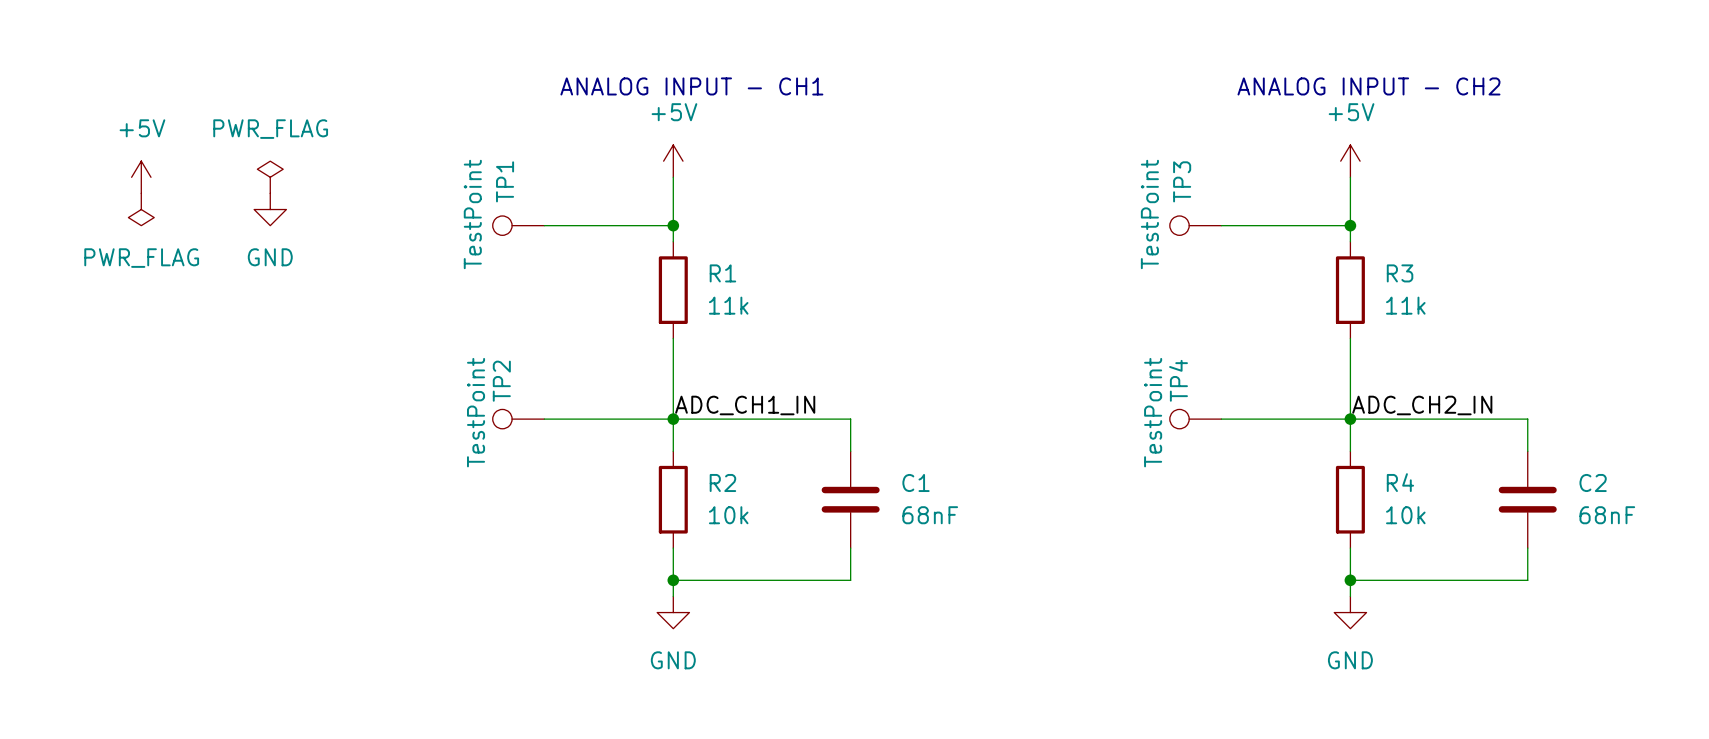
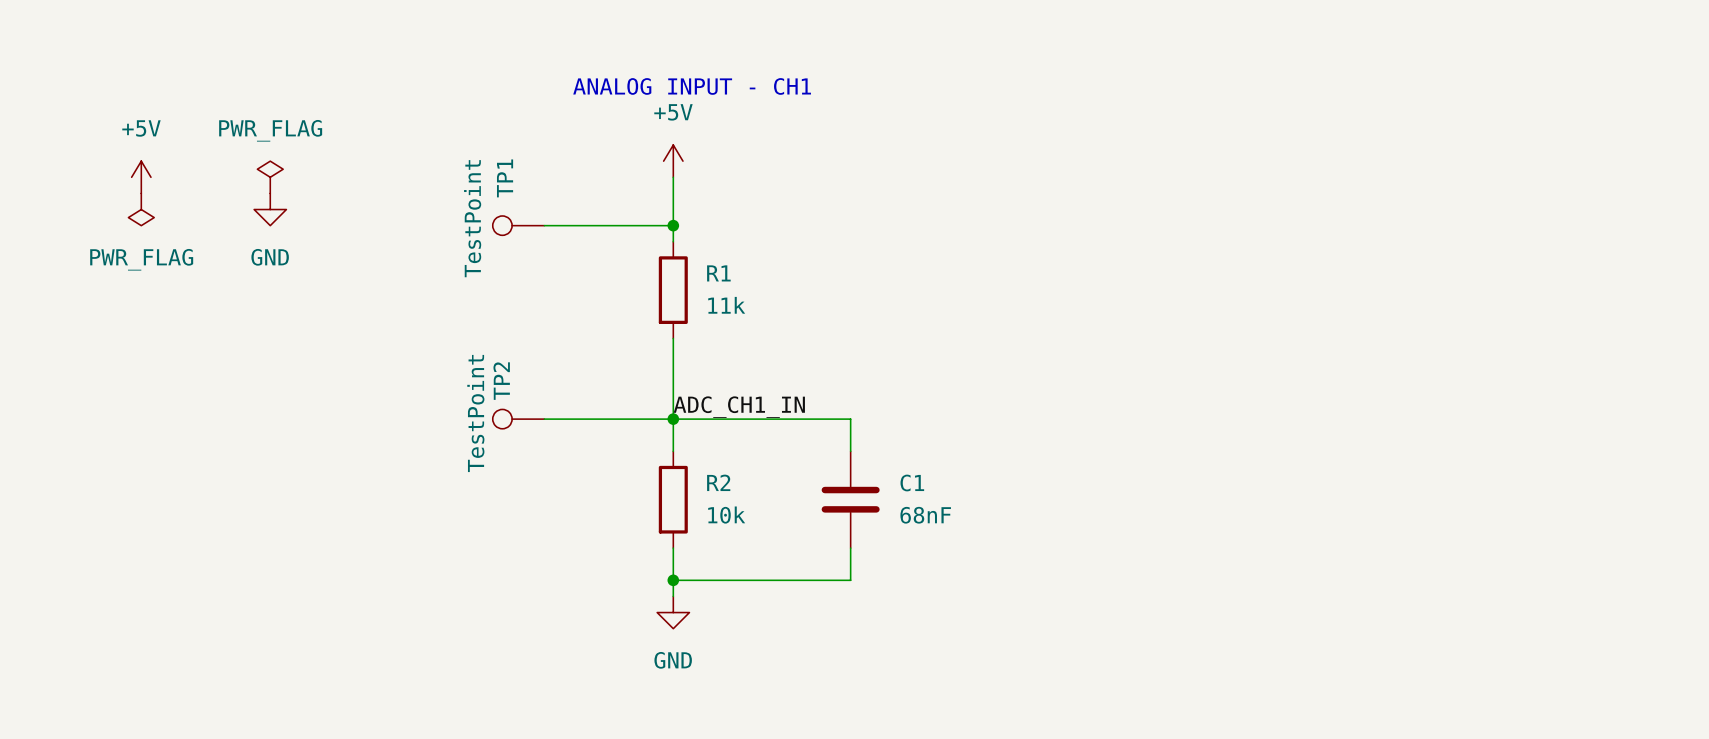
text: ANALOG INPUT - CH2 (1368, 86) -> none
power symbol: +5V (1350, 161) -> none
wire: (1350, 177) (1350, 241) -> none
TP3: TestPoint (1195, 225) -> none
wire: (1221, 225) (1350, 225) -> none
junction: (1350, 225) -> none
R3: 11k (1350, 290) -> none
wire: (1350, 338) (1350, 451) -> none
label: ADC_CH2_IN (1422, 405) -> none
TP4: TestPoint (1195, 419) -> none
wire: (1221, 419) (1527, 419) (1527, 451) -> none
junction: (1350, 419) -> none
R4: 10k (1350, 499) -> none
C2: 68nF (1527, 499) -> none
wire: (1350, 548) (1350, 596) -> none
wire: (1527, 548) (1527, 580) (1350, 580) -> none
junction: (1350, 580) -> none
power symbol: GND (1350, 612) -> none

